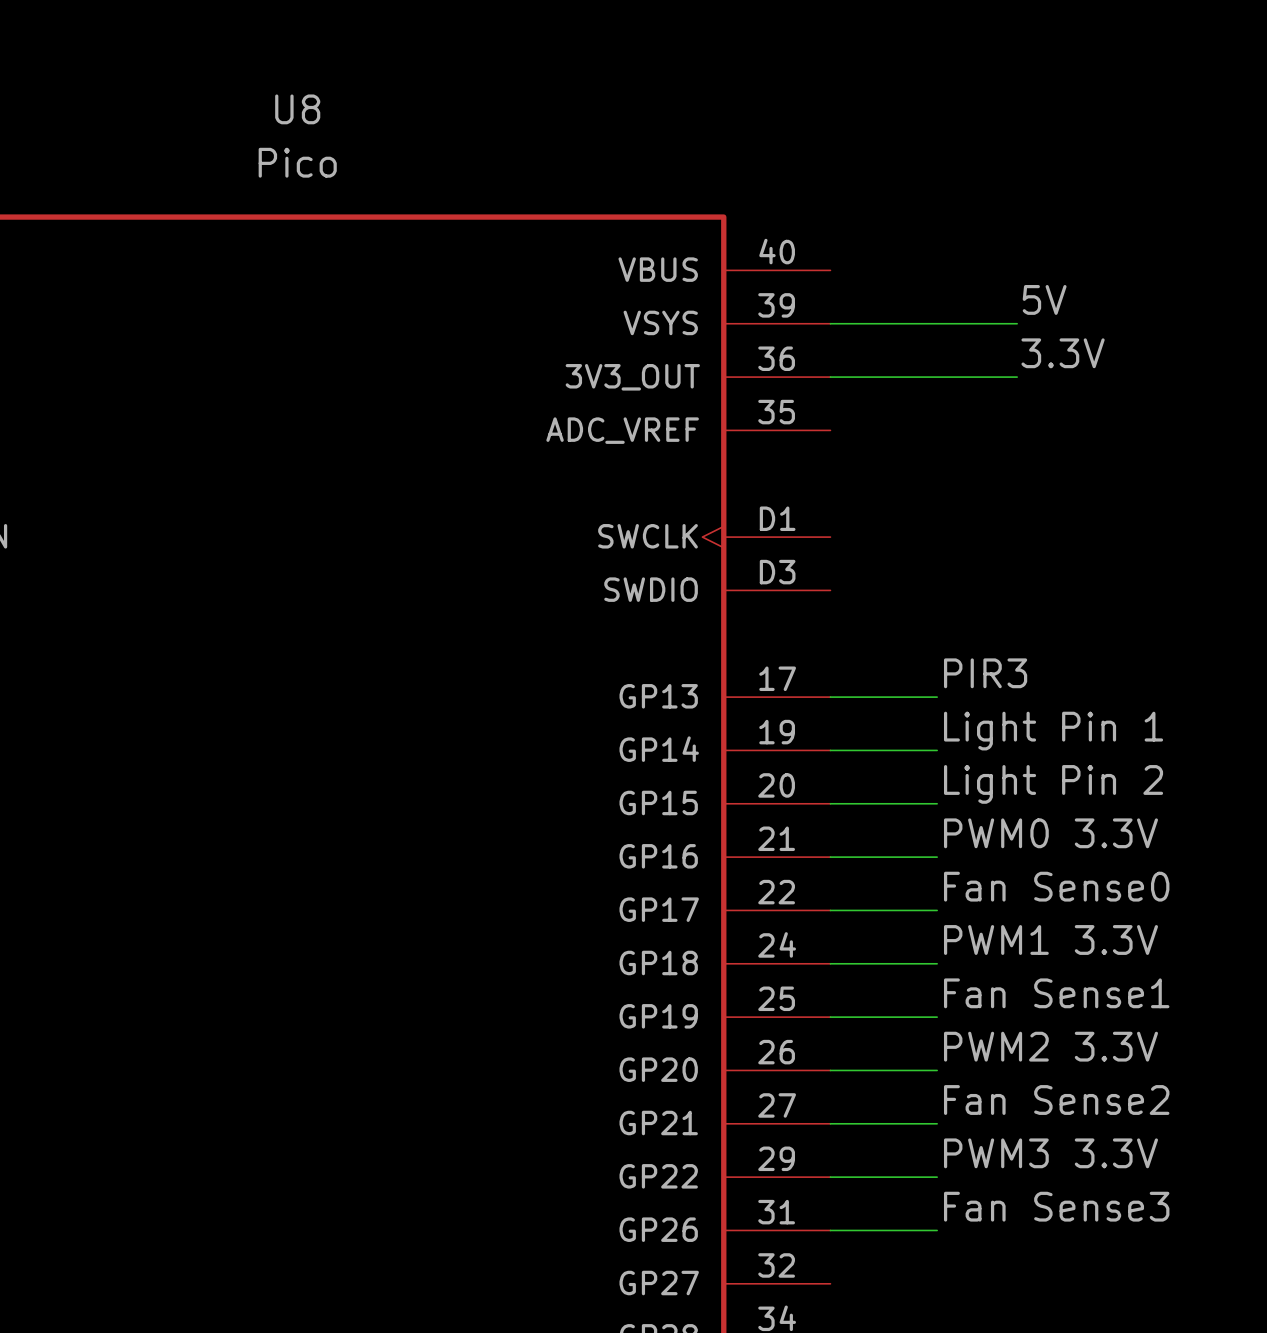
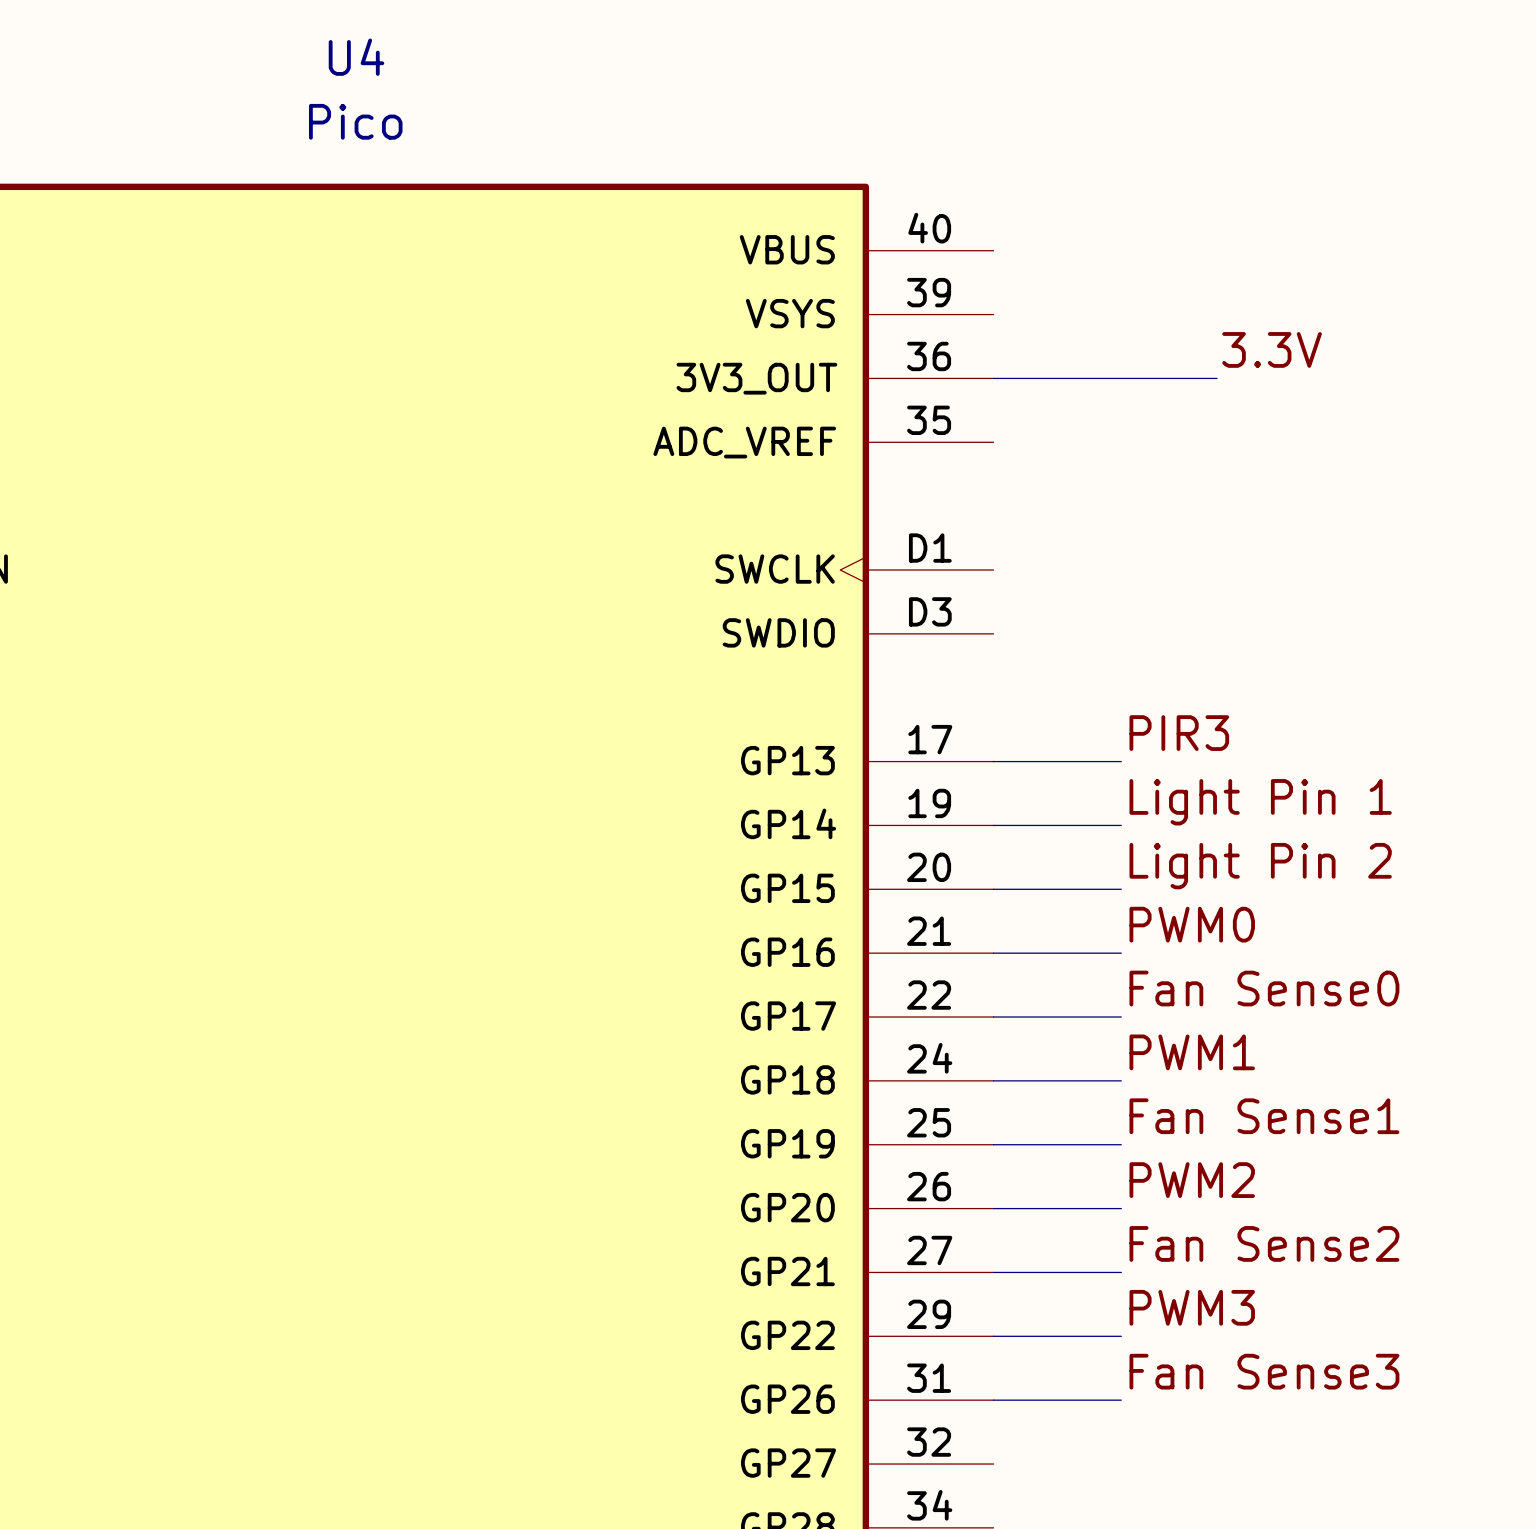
U8 name: U8 (297, 109) -> U4 (356, 57)
label: 5V (1044, 299) -> none
wire: (830, 323) (1017, 323) -> none
label: PWM0 3.3V (1050, 833) -> PWM0 (1192, 924)
label: PWM1 3.3V (1050, 939) -> PWM1 (1192, 1052)
label: PWM2 3.3V (1050, 1046) -> PWM2 (1192, 1180)
label: PWM3 3.3V (1050, 1153) -> PWM3 (1192, 1307)

